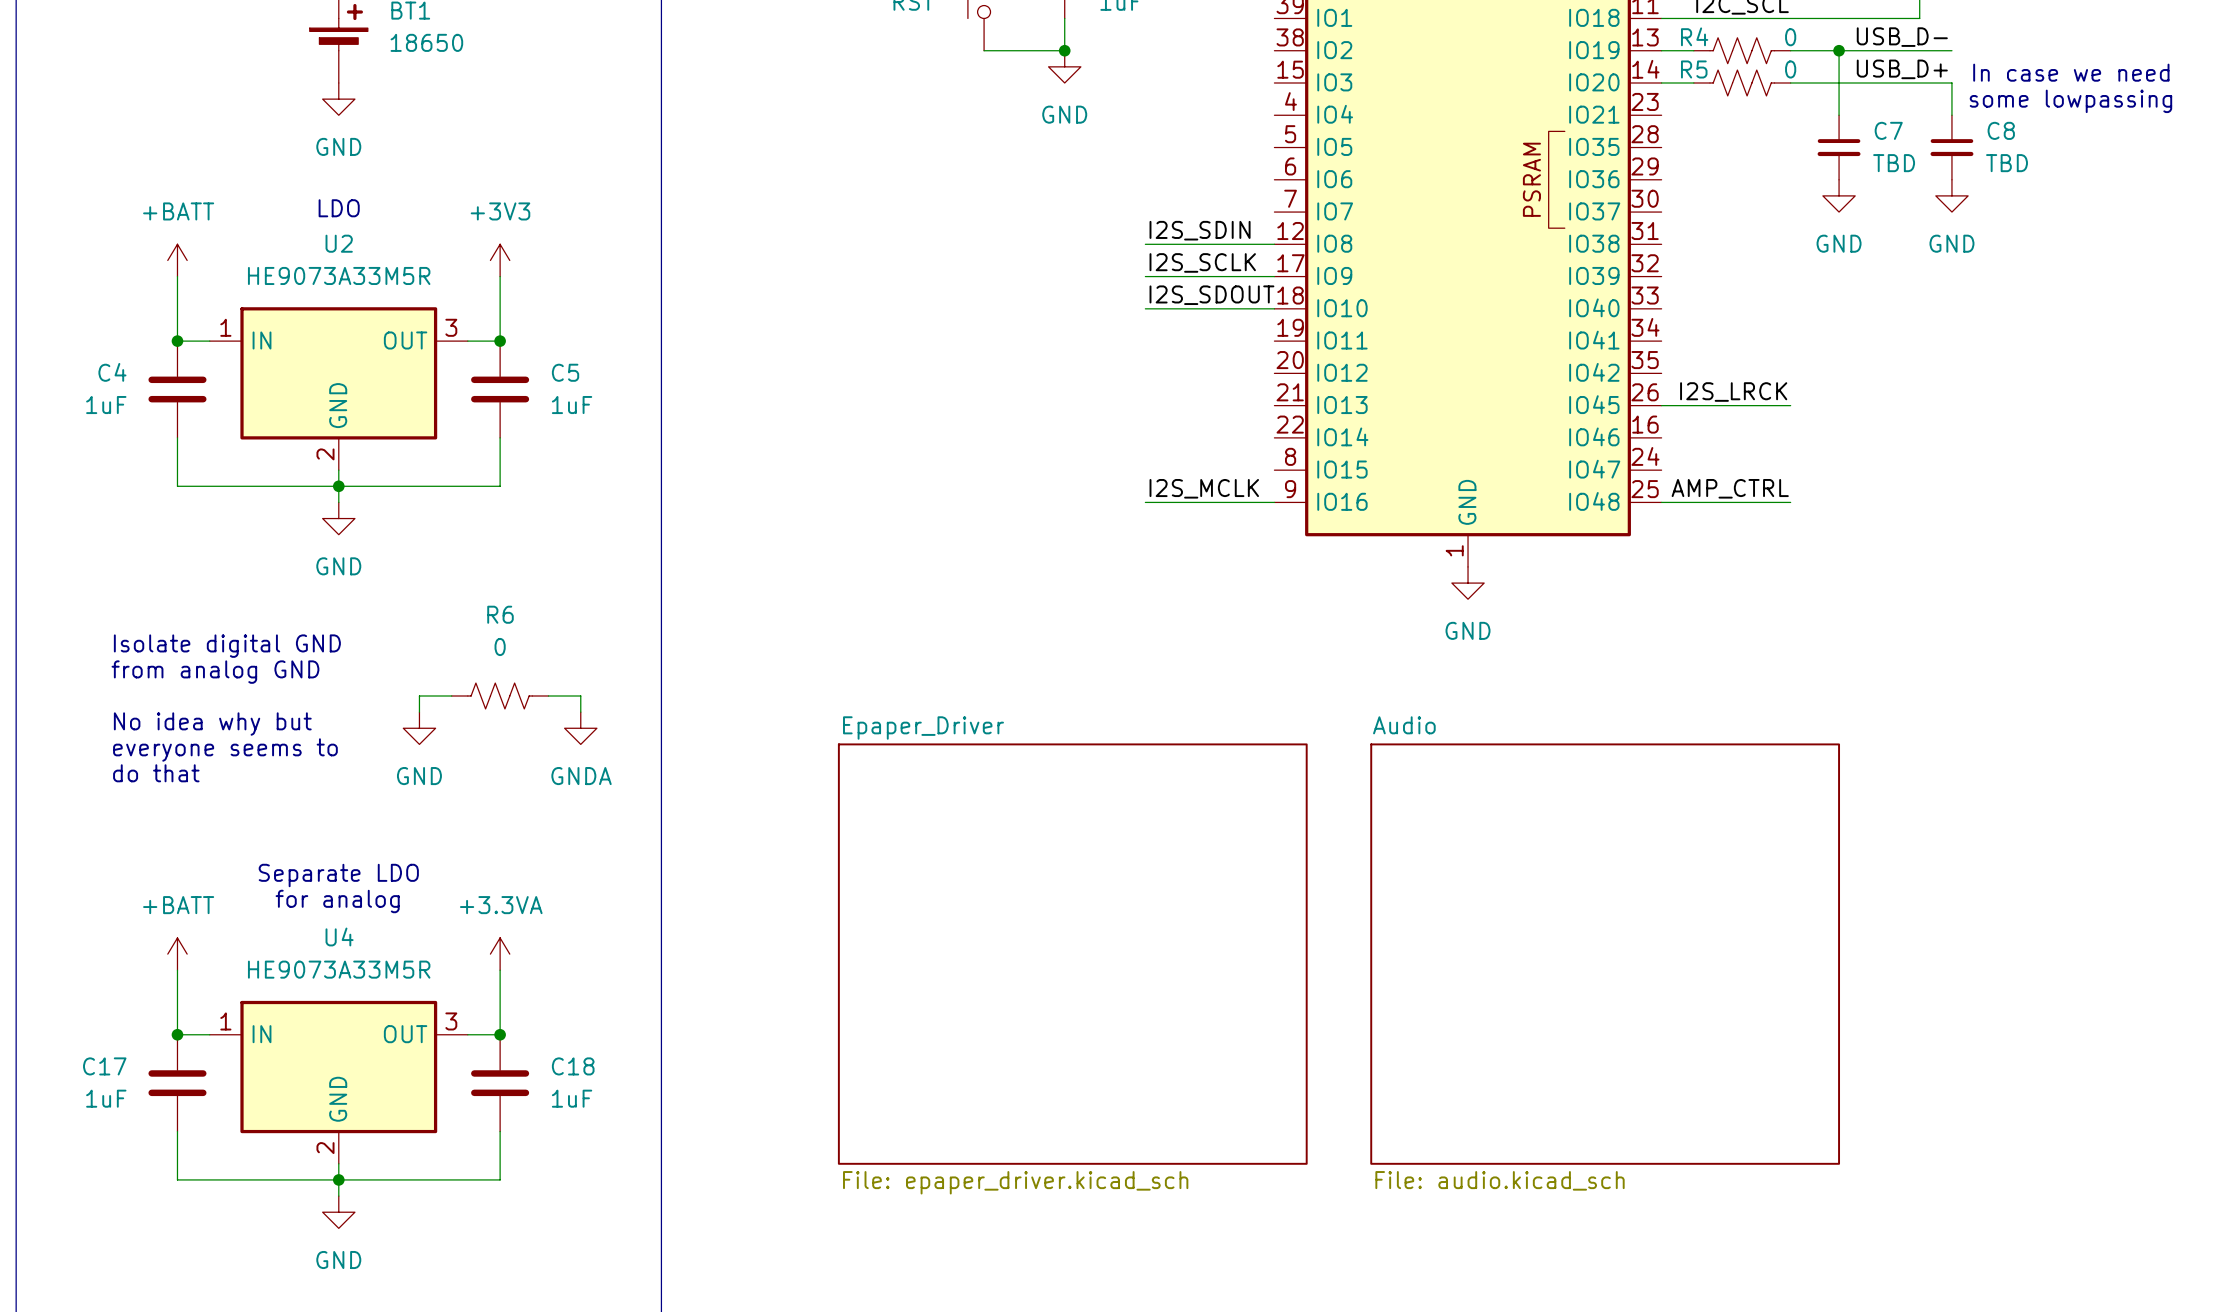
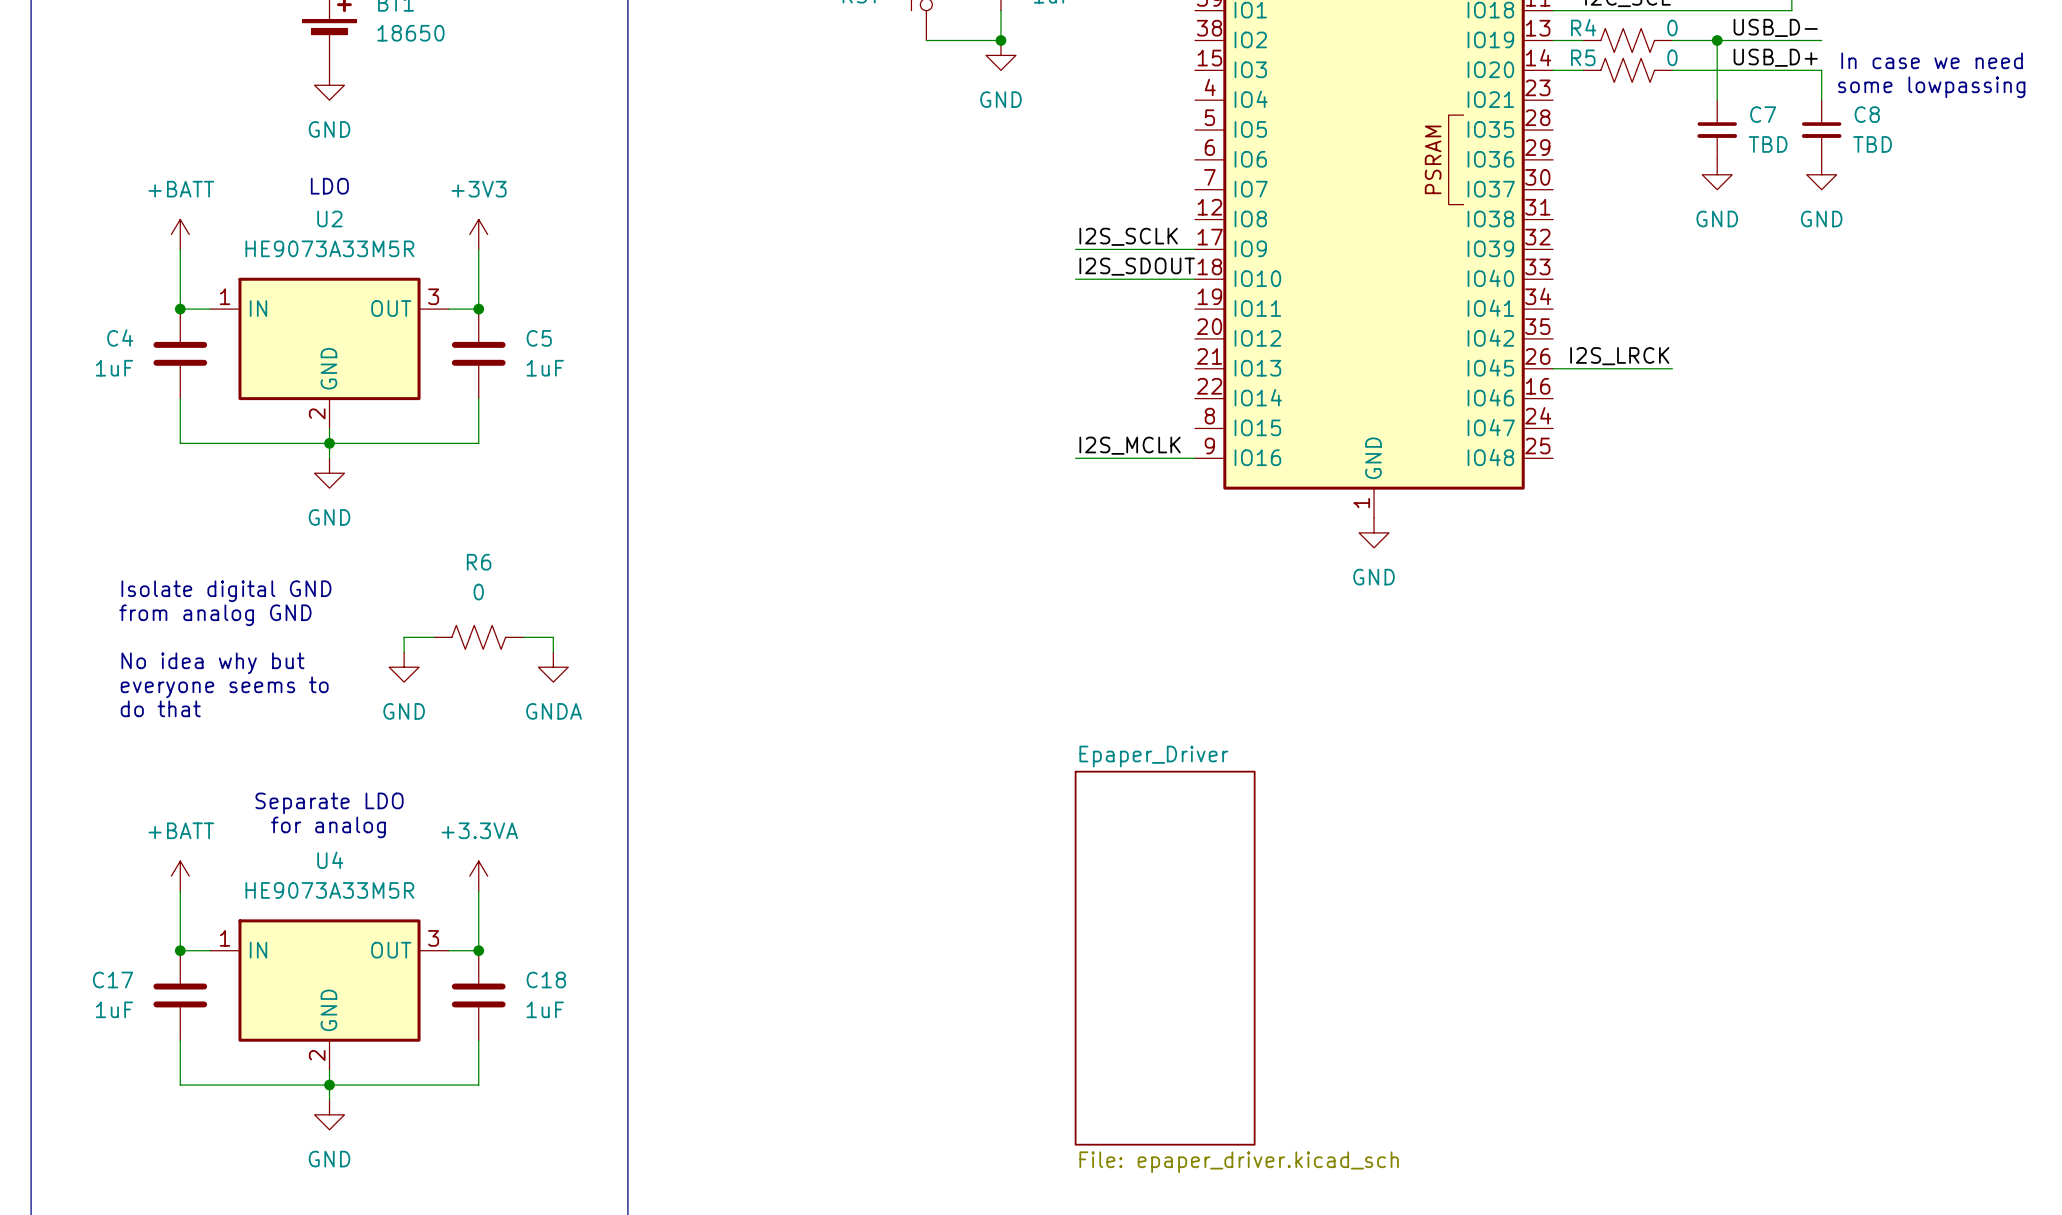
label: I2S_SDIN (1200, 230) -> none
wire: (1145, 244) (1274, 244) -> none
label: AMP_CTRL (1730, 488) -> none
wire: (1661, 502) (1790, 502) -> none
sheet Epaper_Driver: File: epaper_driver.kicad_sch (1072, 954) -> none
sheet Audio: File: audio.kicad_sch (1605, 954) -> none
sheet Epaper_Driver: none -> File: epaper_driver.kicad_sch (1165, 958)

